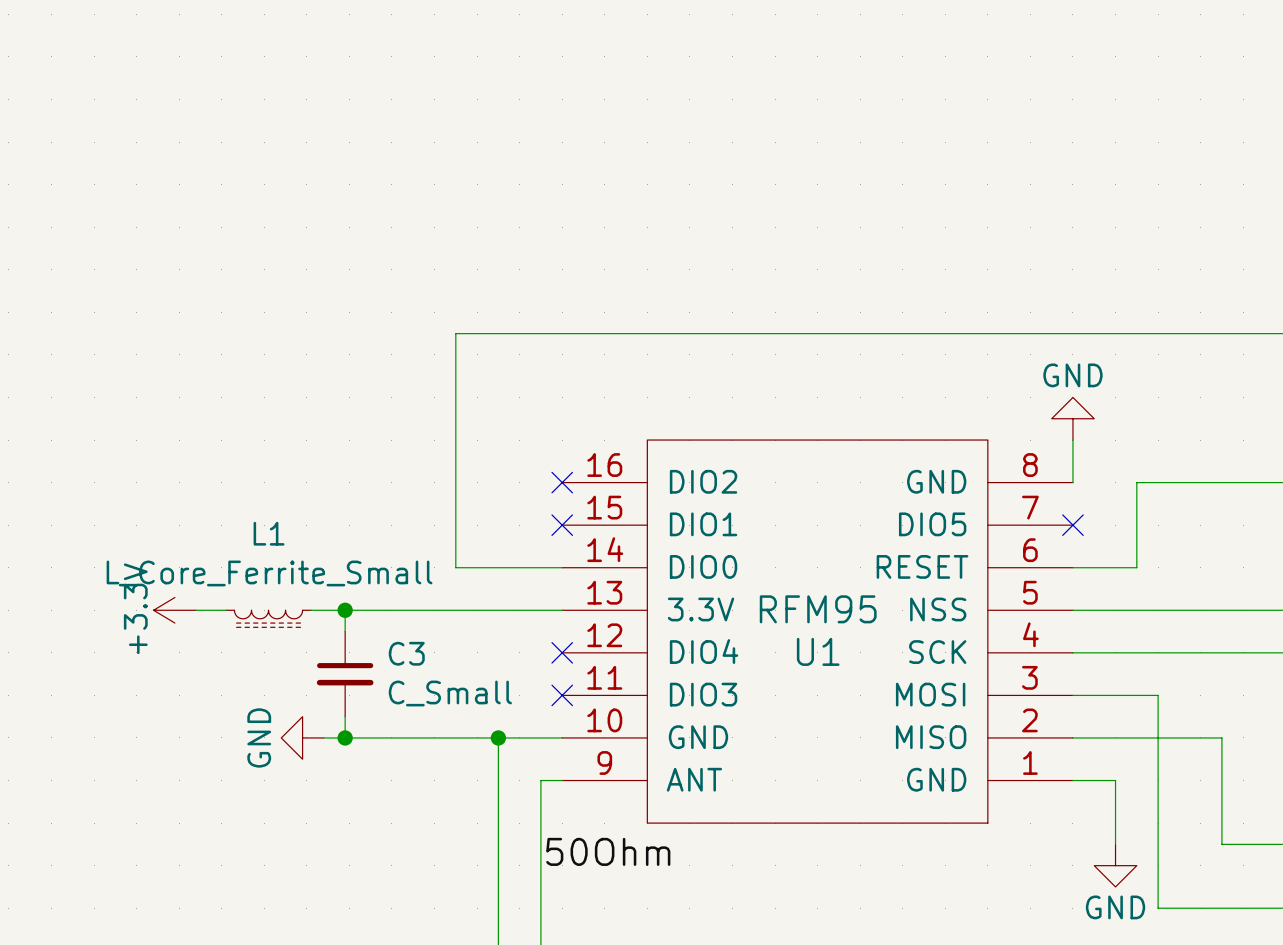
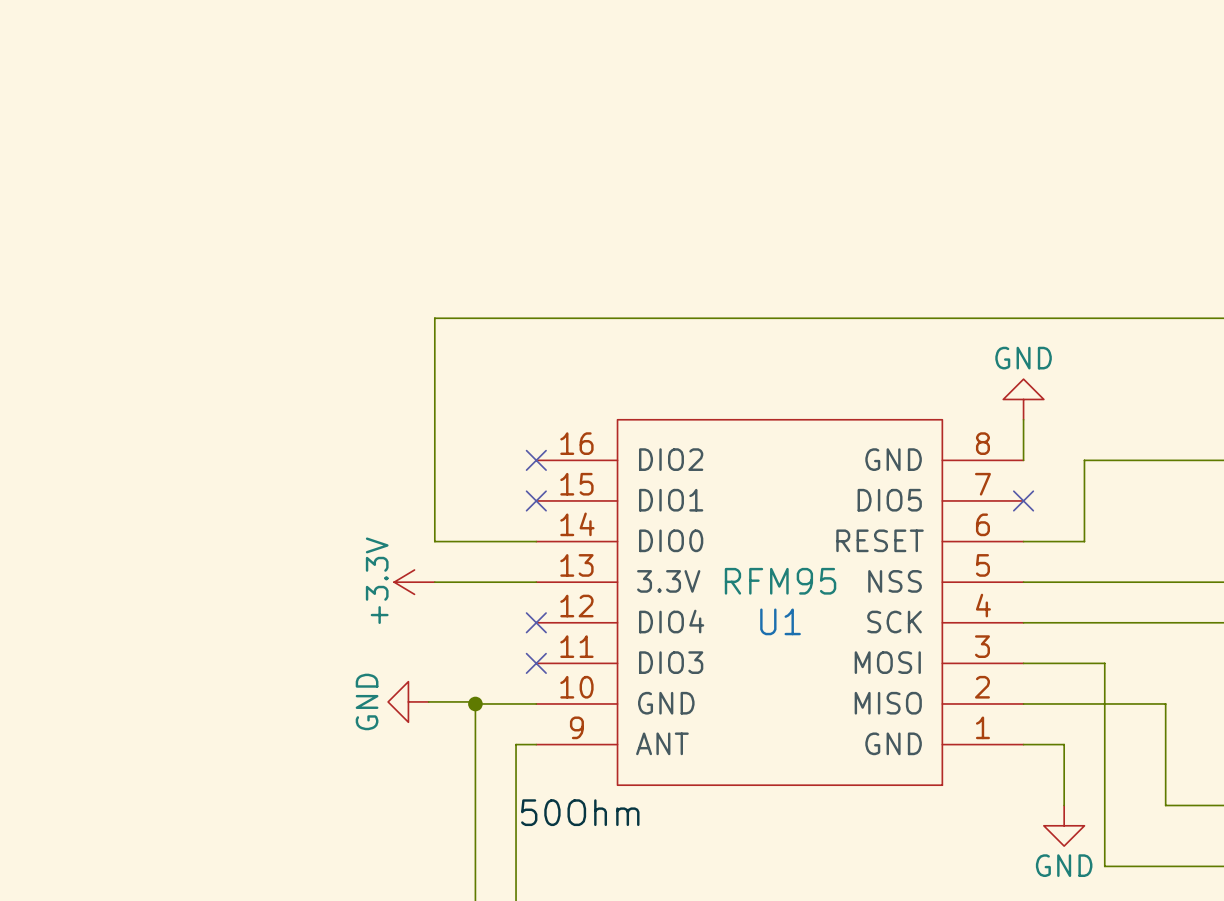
power symbol position: +3.3V (174, 610) -> +3.3V (414, 582)
wire: (196, 610) (225, 610) -> none
wire: (311, 610) (455, 610) -> none
wire: (345, 610) (345, 631) -> none
junction: (345, 610) -> none
L1: L_Core_Ferrite_Small (268, 618) -> none
C3: C_Small (345, 674) -> none
wire: (345, 716) (345, 737) -> none
power symbol position: GND (302, 737) -> GND (408, 701)
wire: (323, 737) (498, 737) -> (428, 701) (475, 701) (475, 703)
junction: (345, 737) -> none

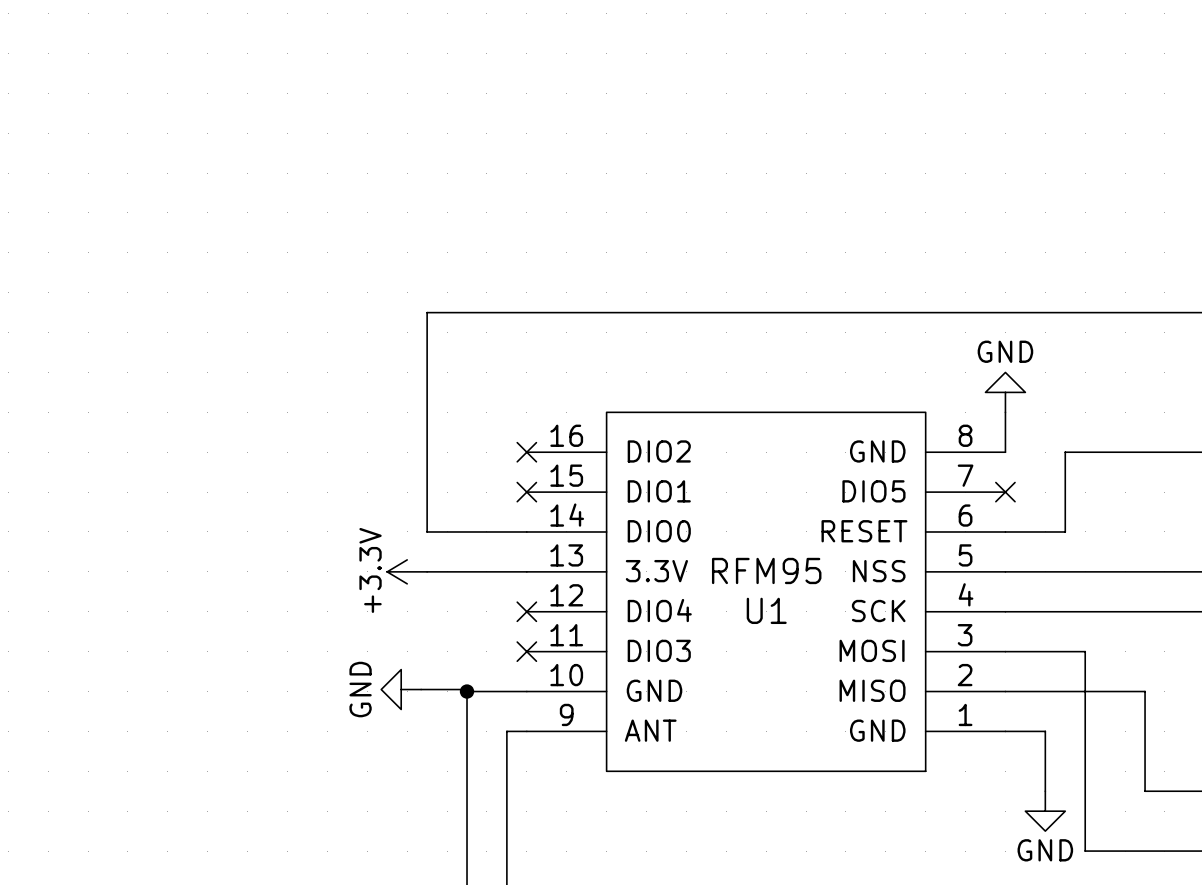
label: 50Ohm (580, 812) -> none

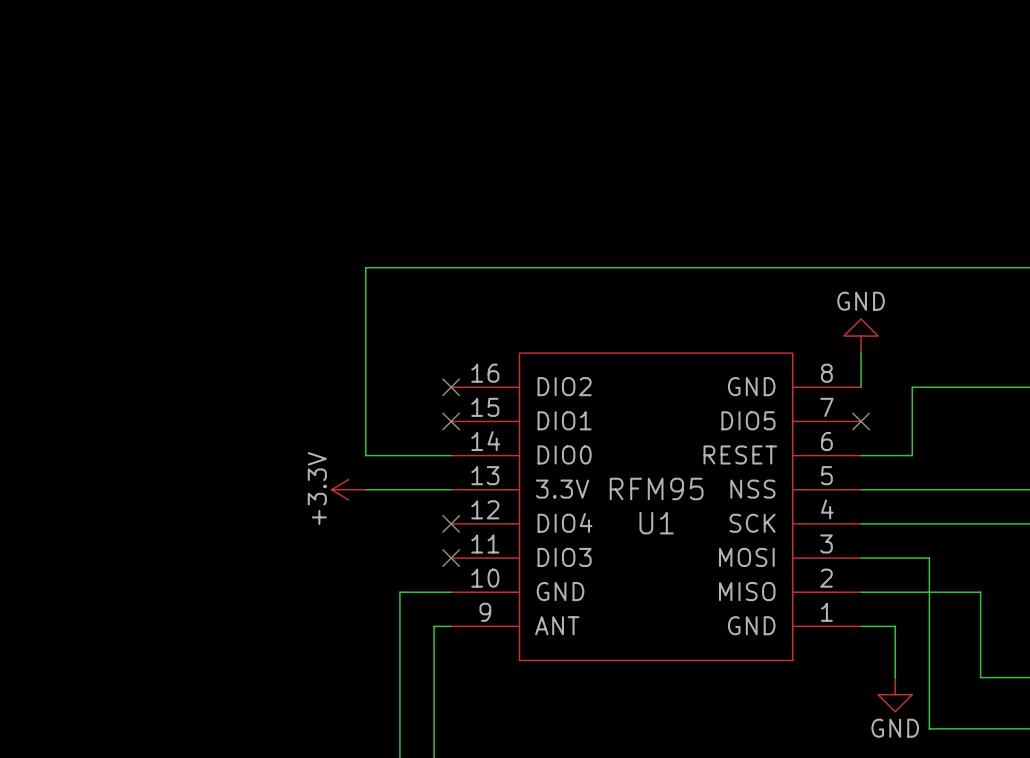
power symbol: GND (401, 689) -> none
wire: (421, 689) (467, 689) (467, 691) -> none
junction: (467, 691) -> none

